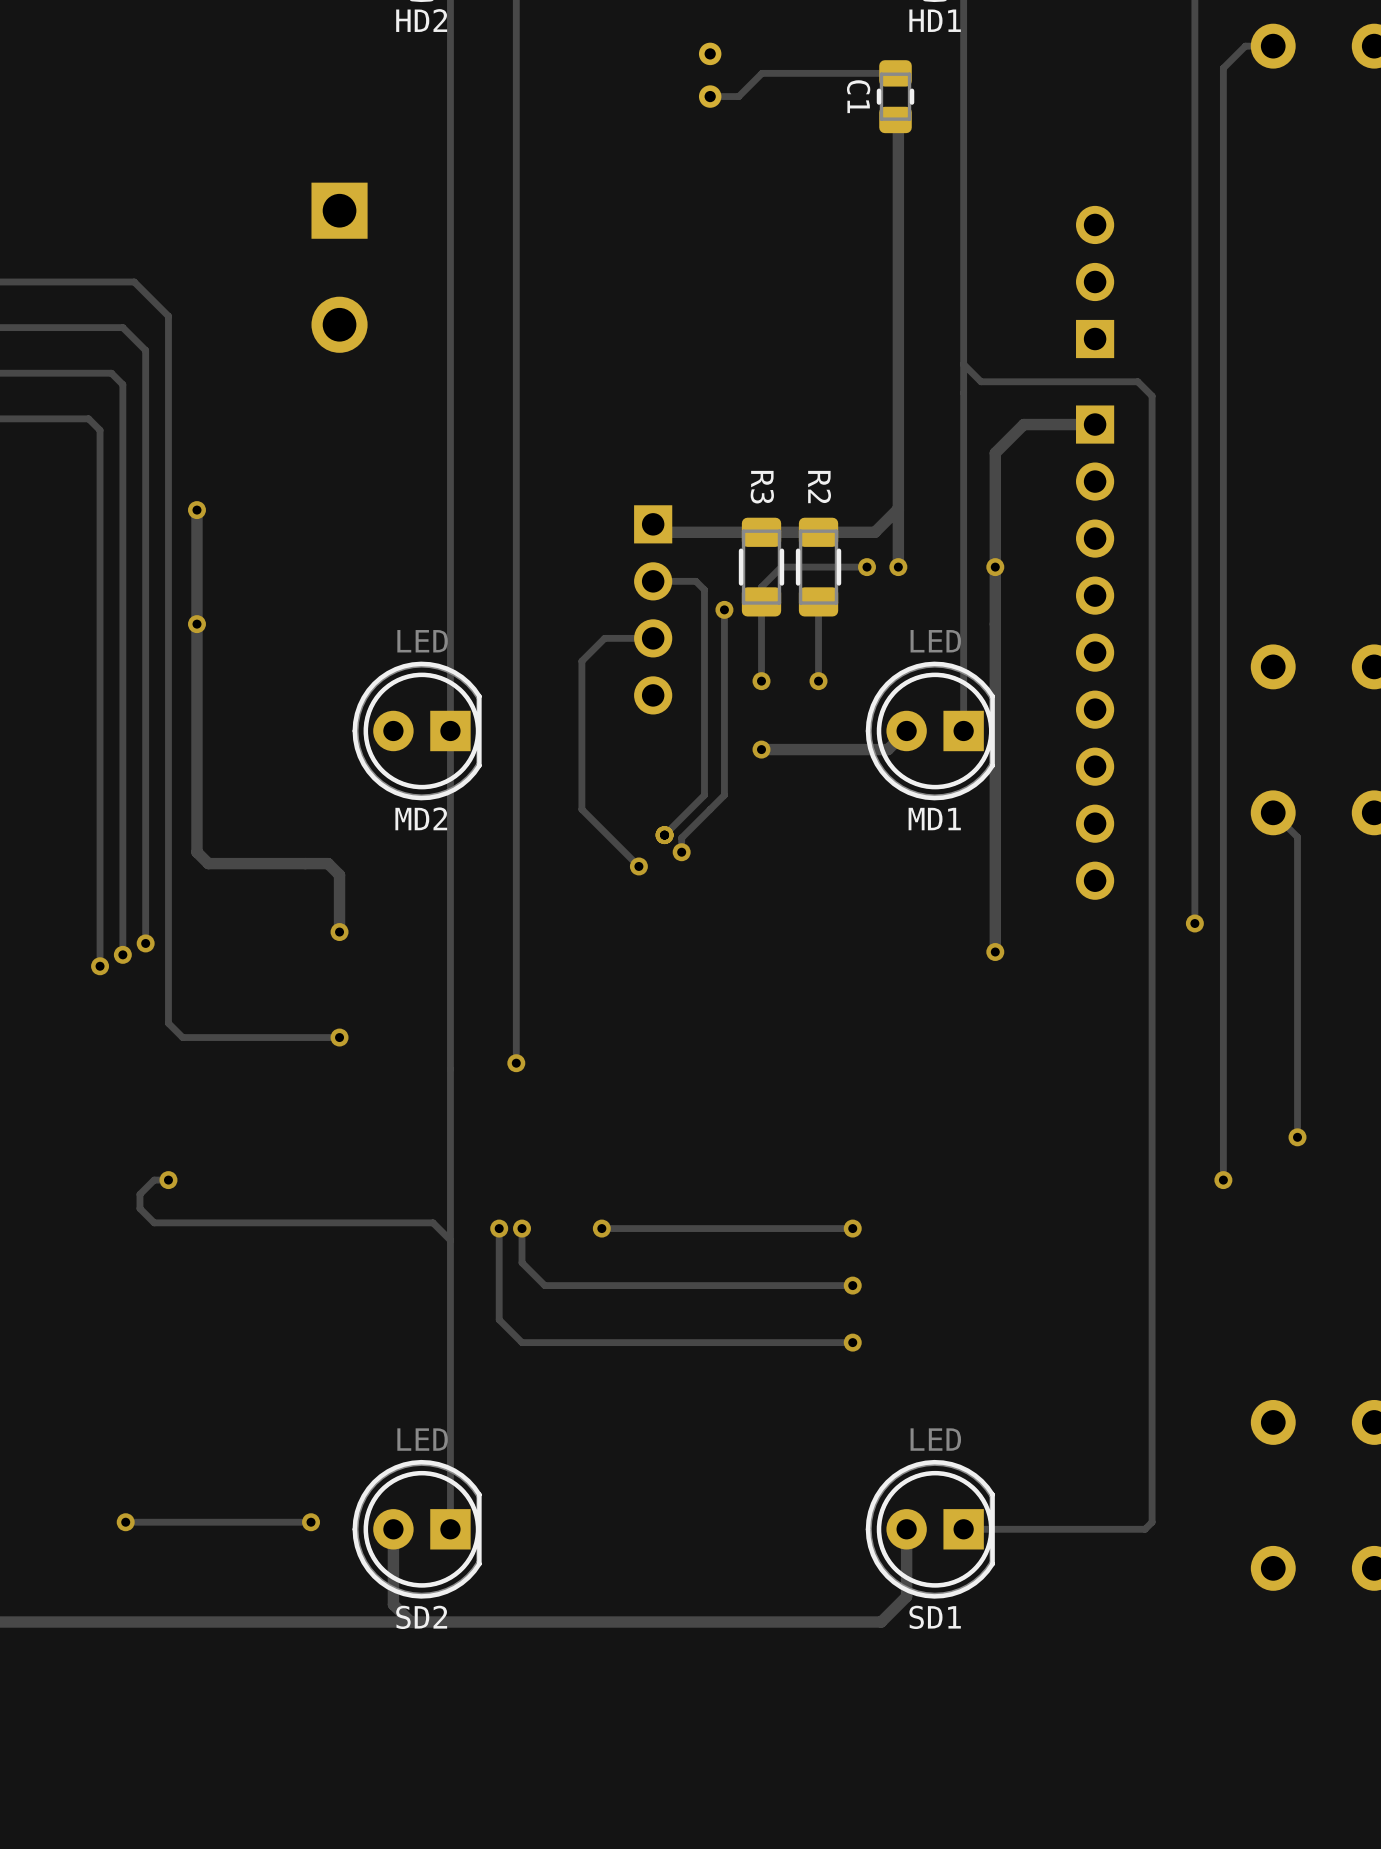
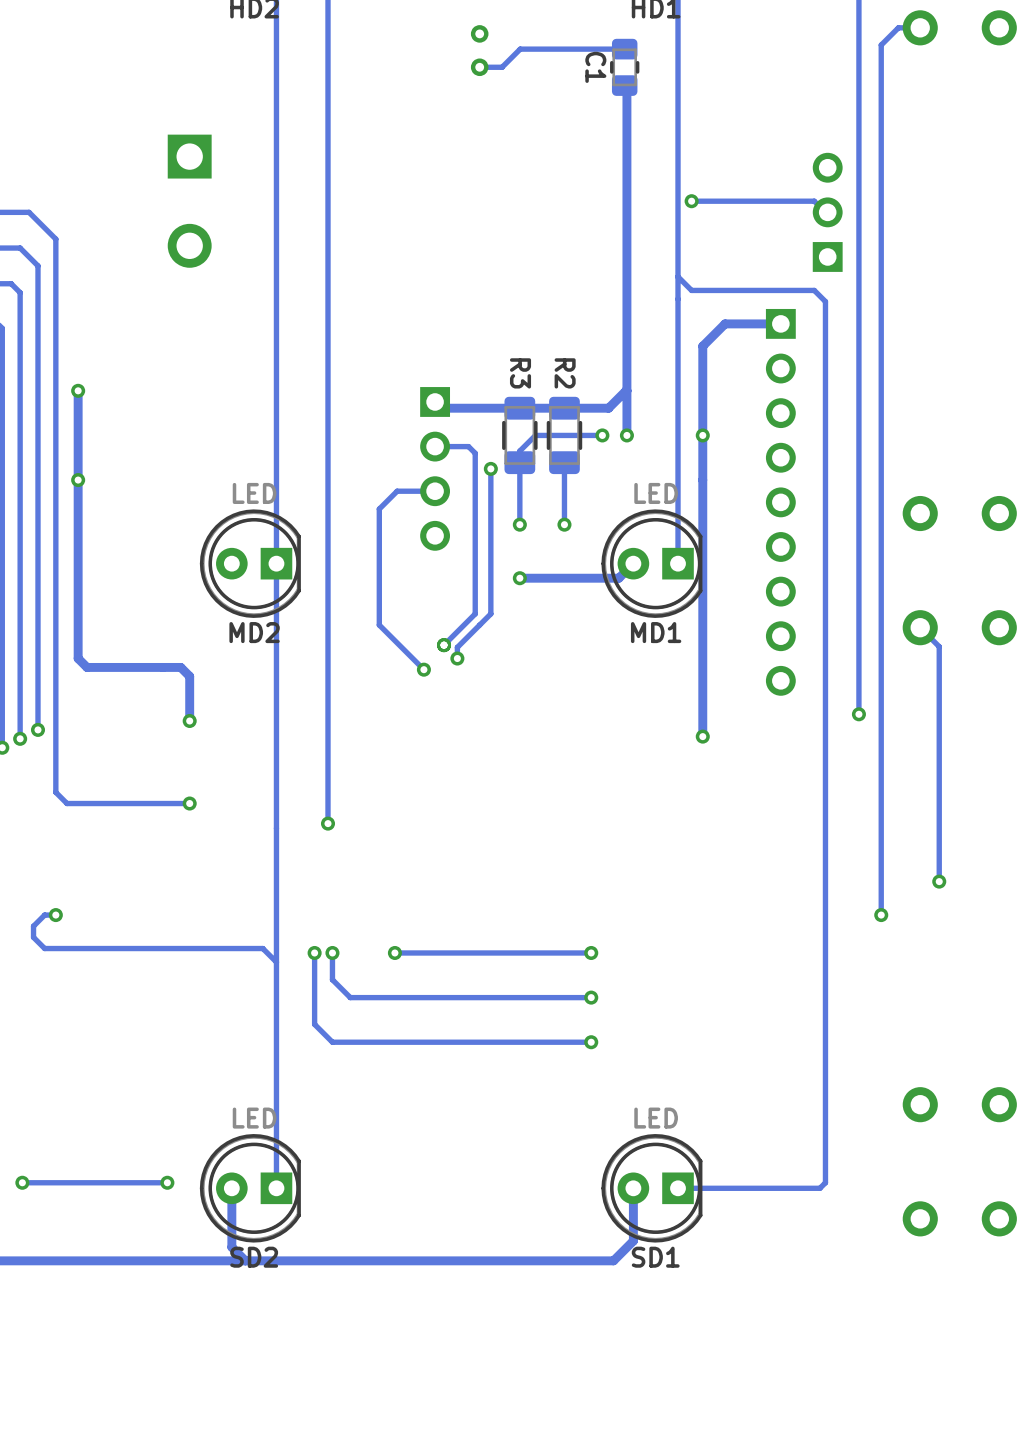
track: none -> (691, 201) (814, 201) (825, 212)
via: none -> (691, 201)
part position: (1095, 281) -> (827, 212)

